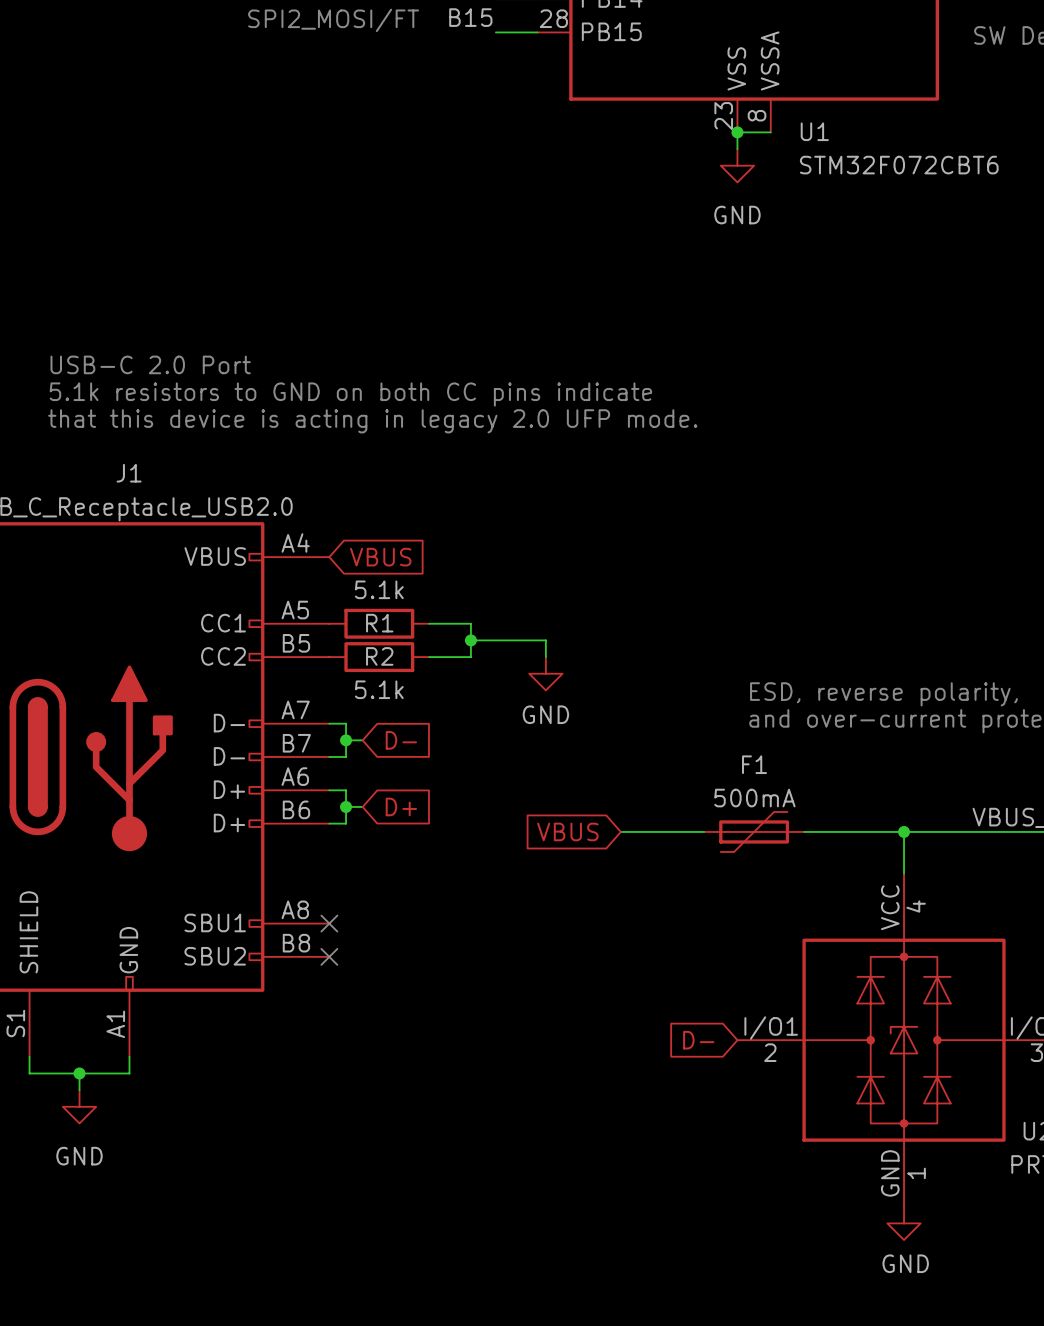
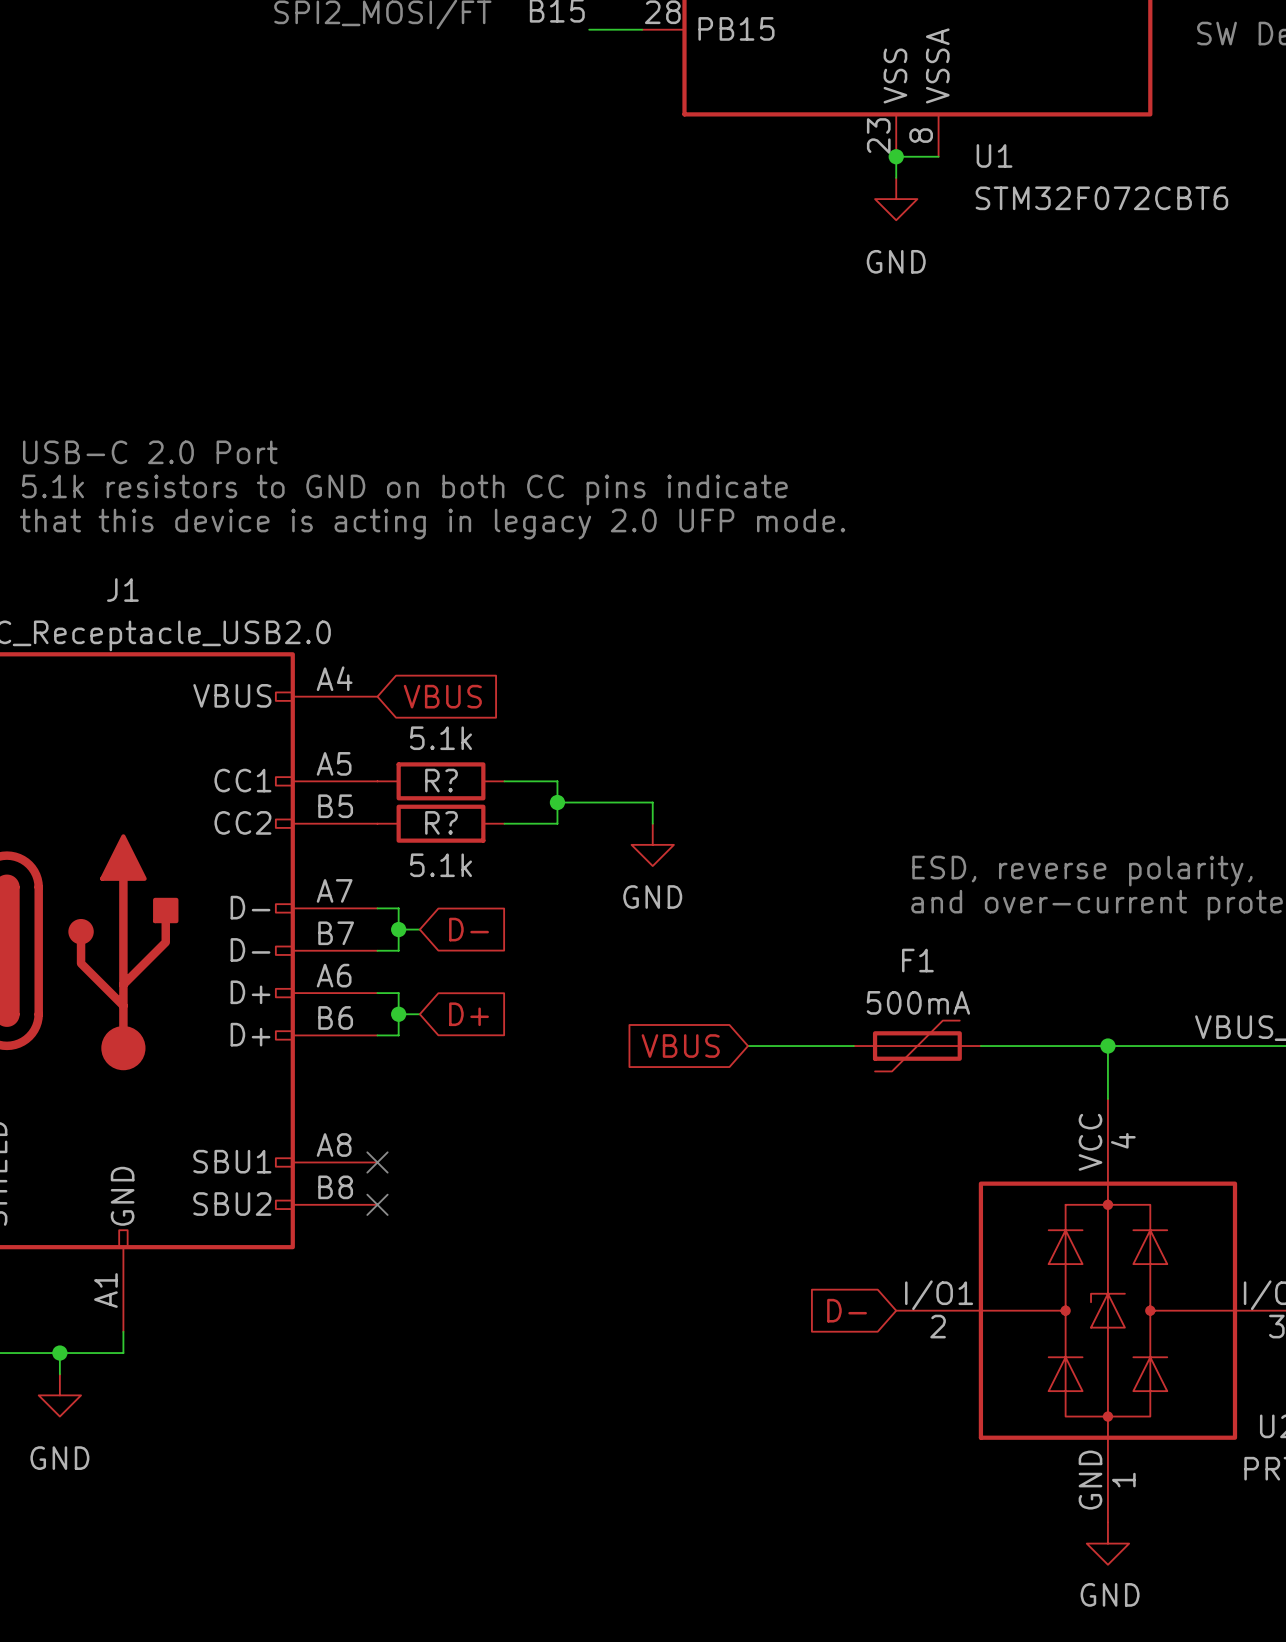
R1 name: R1 (379, 623) -> R? (441, 780)
R2 name: R2 (379, 656) -> R? (441, 822)

